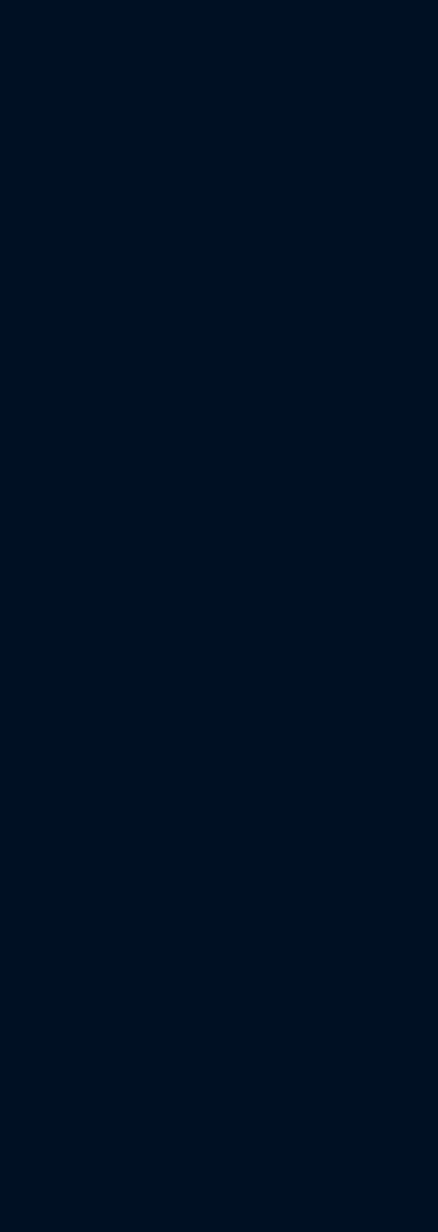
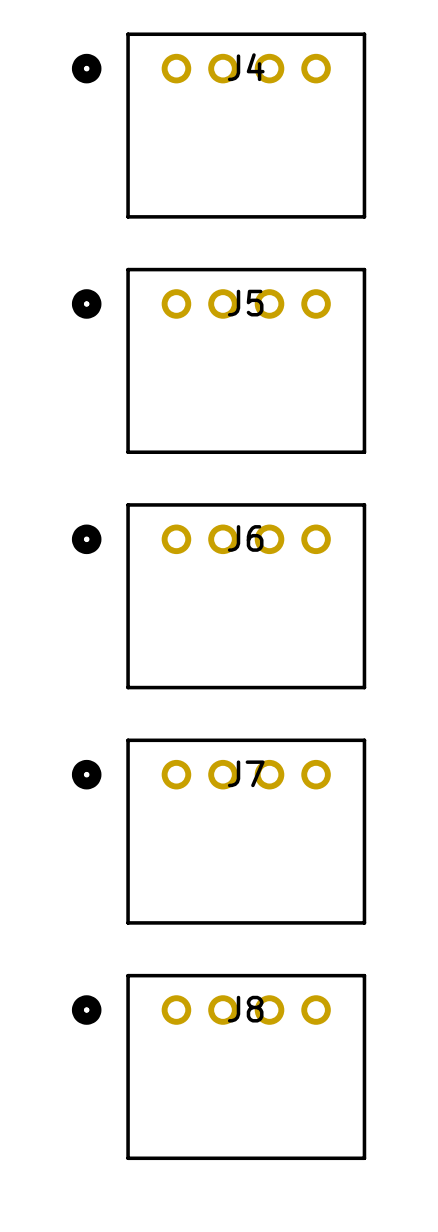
J4: none -> (219, 125)
J5: none -> (219, 360)
J6: none -> (219, 596)
J7: none -> (219, 831)
J8: none -> (219, 1066)

